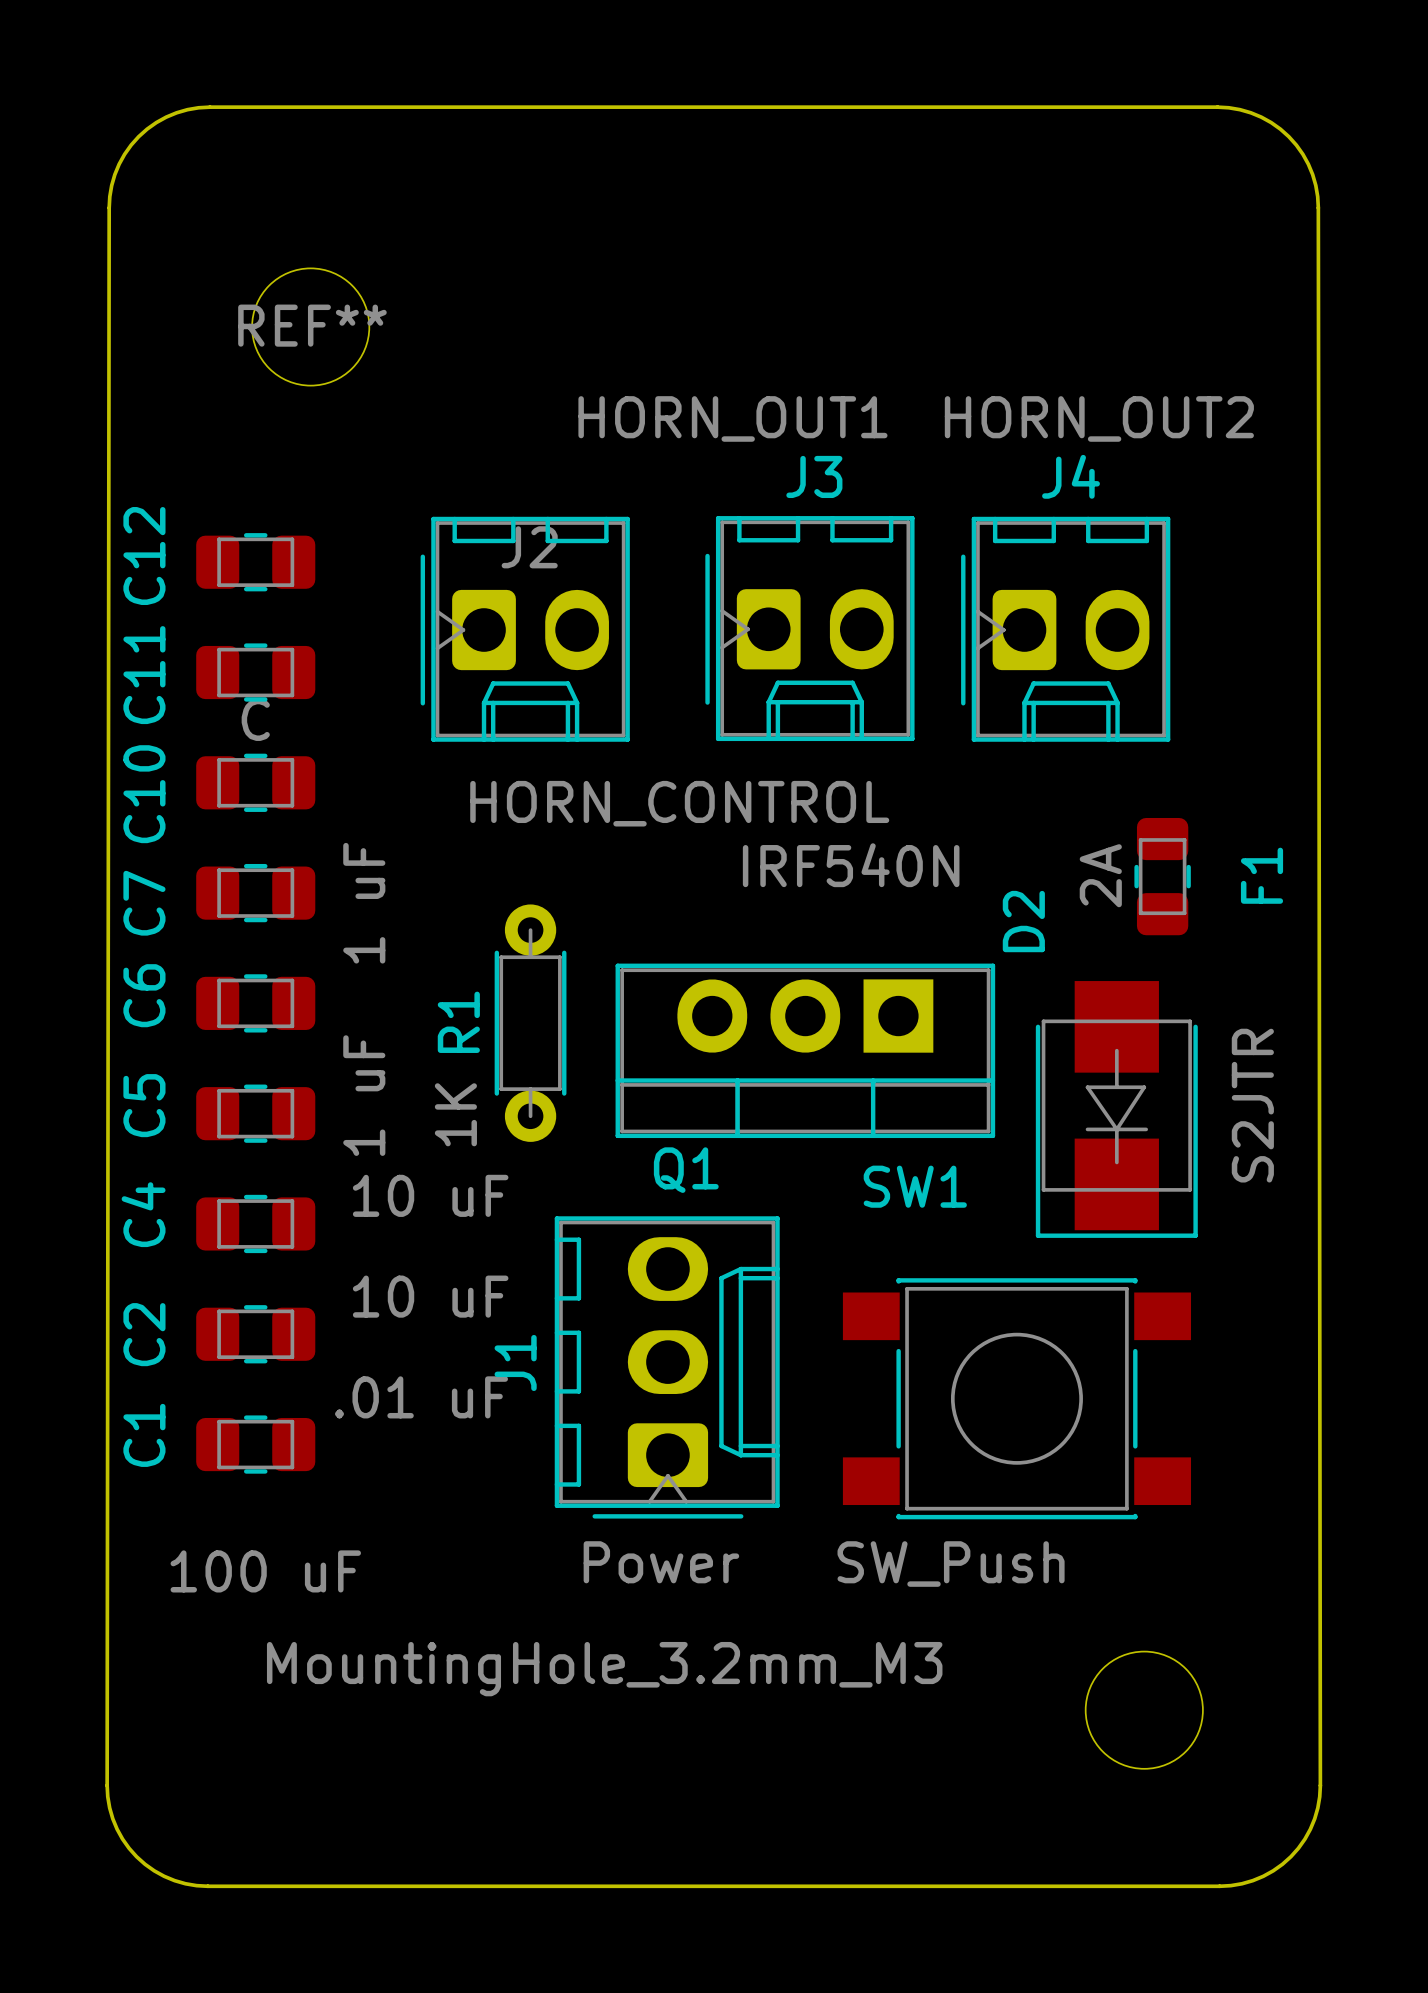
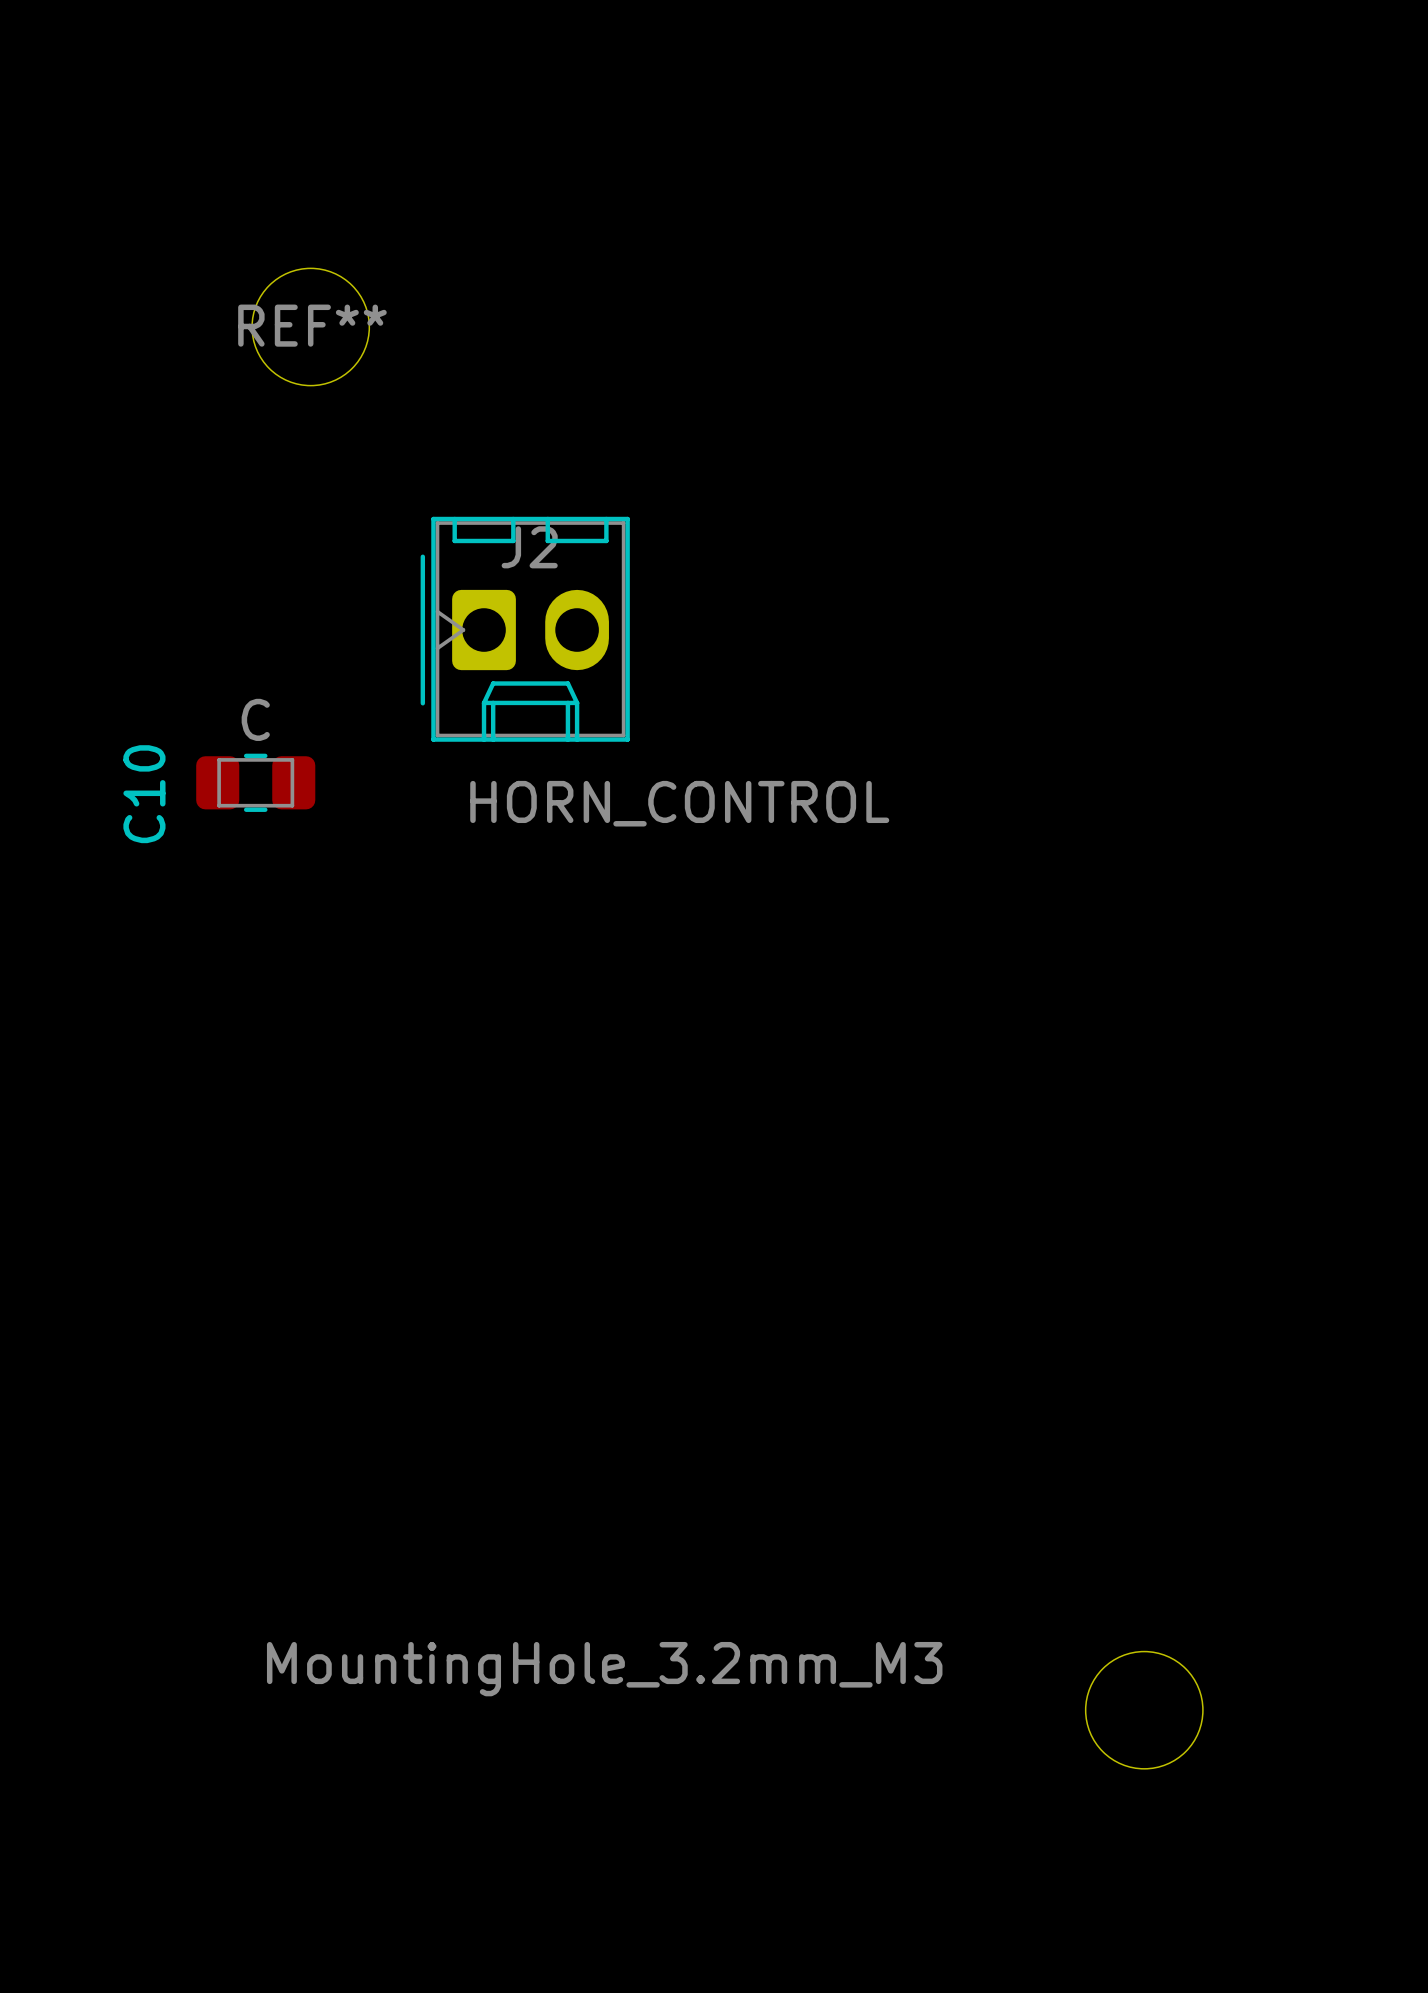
board edge: (209, 107) (1217, 107) (1240, 109) (1271, 122) (1288, 136) (1302, 154) (1315, 185) (1318, 207) (1320, 1785) (1317, 1807) (1310, 1829) (1298, 1848) (1273, 1870) (1252, 1880) (1219, 1886) (207, 1886) (174, 1880) (154, 1870) (136, 1856) (122, 1839) (109, 1807) (107, 1785) (109, 207) (114, 174) (124, 154) (138, 136) (166, 117) (187, 109) (209, 107) -> none
C12: (255, 562) -> none
J3: HORN_OUT1 (809, 628) -> none
J4: HORN_OUT2 (1065, 629) -> none
C11: (255, 672) -> none
F1: 2A (1162, 876) -> none
C7: 1 uF (255, 893) -> none
C6: 1 uF (255, 1003) -> none
R1: 1K (530, 1023) -> none
Q1: IRF540N (805, 1050) -> none
D2: S2JTR (1116, 1109) -> none
C5: 10 uF (255, 1113) -> none
C4: 10 uF (255, 1223) -> none
C2: .01 uF (255, 1334) -> none
J1: Power (667, 1367) -> none
SW1: SW_Push (1016, 1398) -> none
C1: 100 uF (255, 1444) -> none

